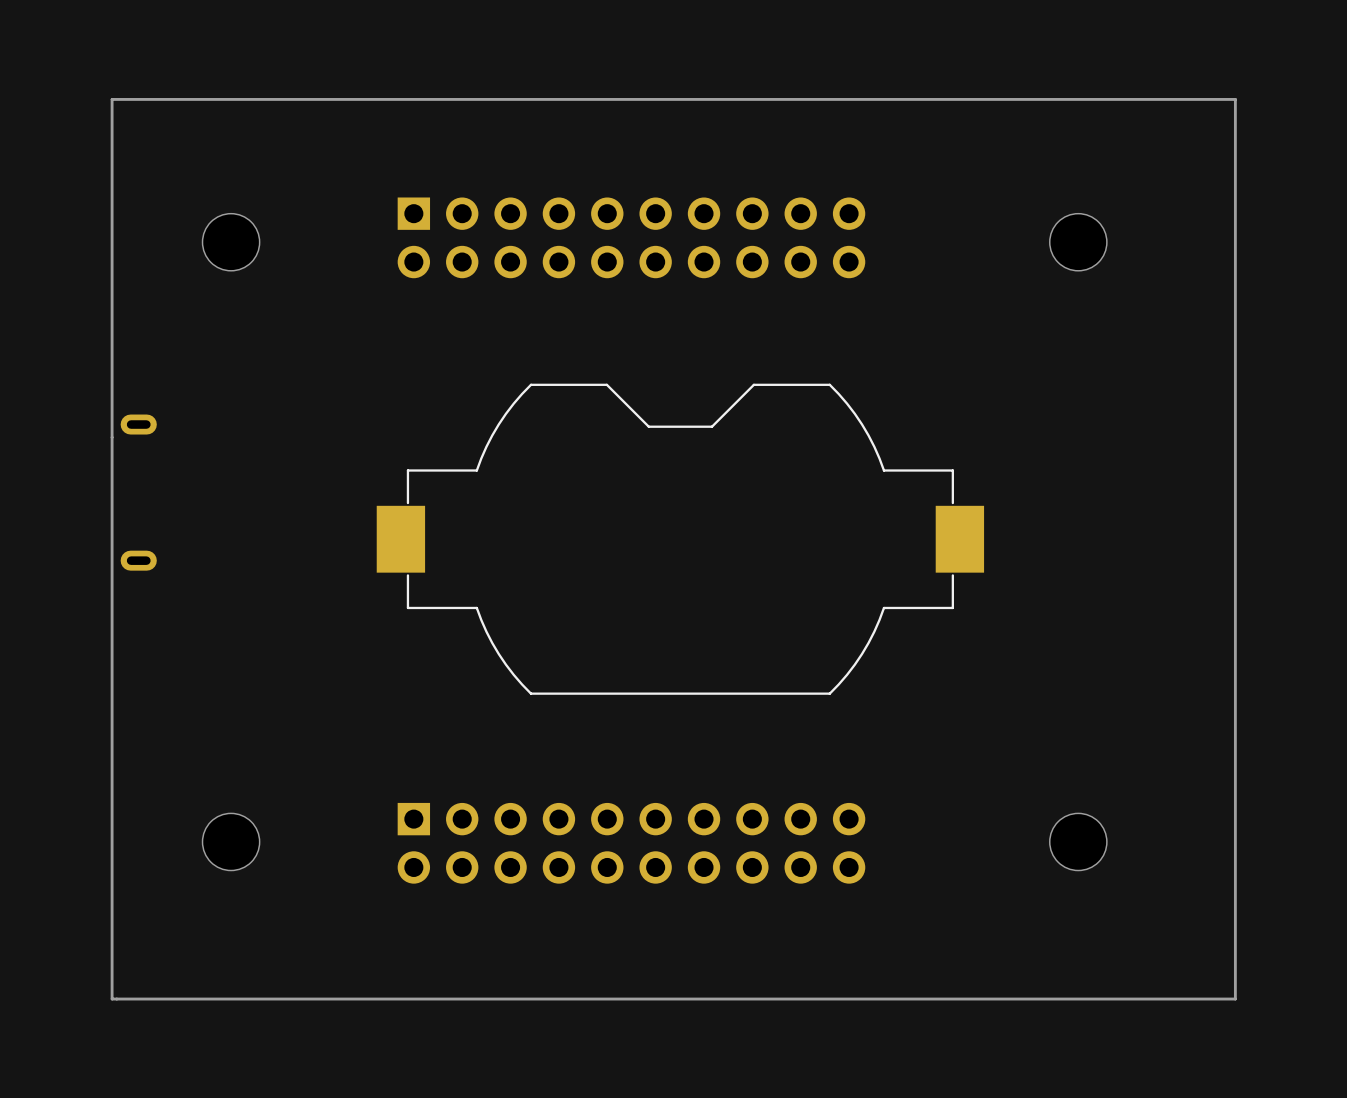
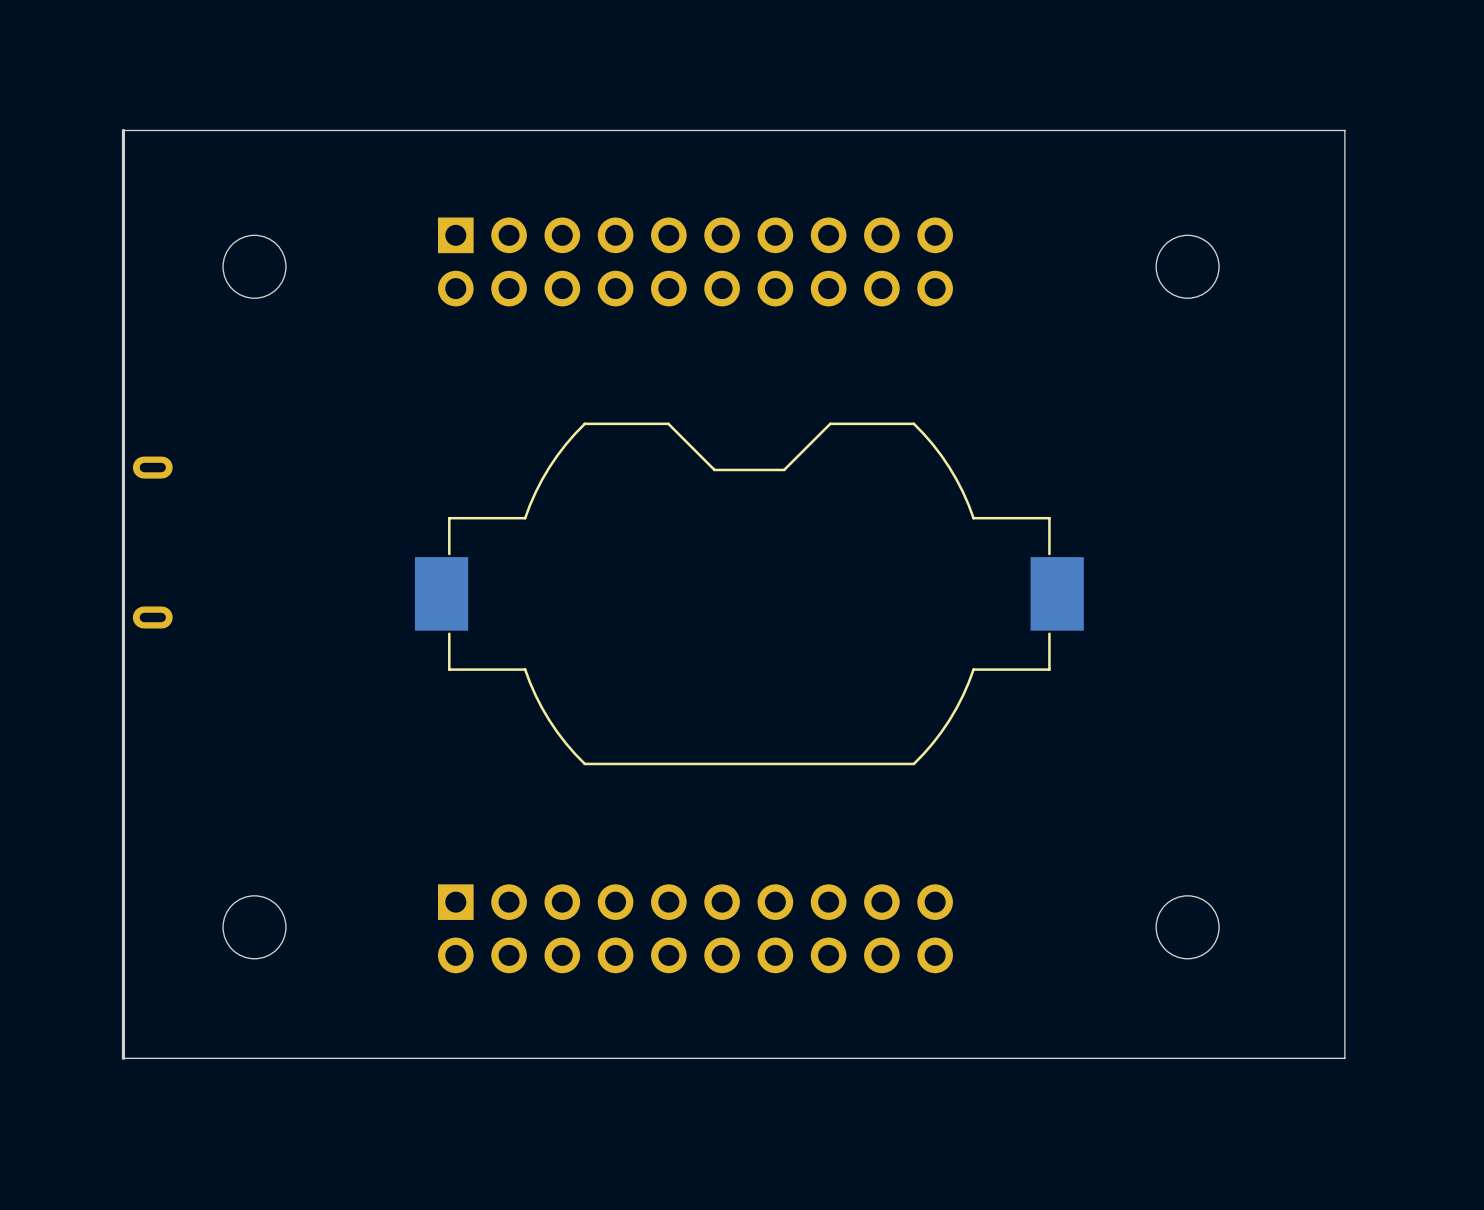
board edge: (112, 118) (112, 99) (1235, 99) (1235, 999) (112, 999) (112, 960) -> (123, 130) (1344, 130) (1344, 1058) (123, 1058)

